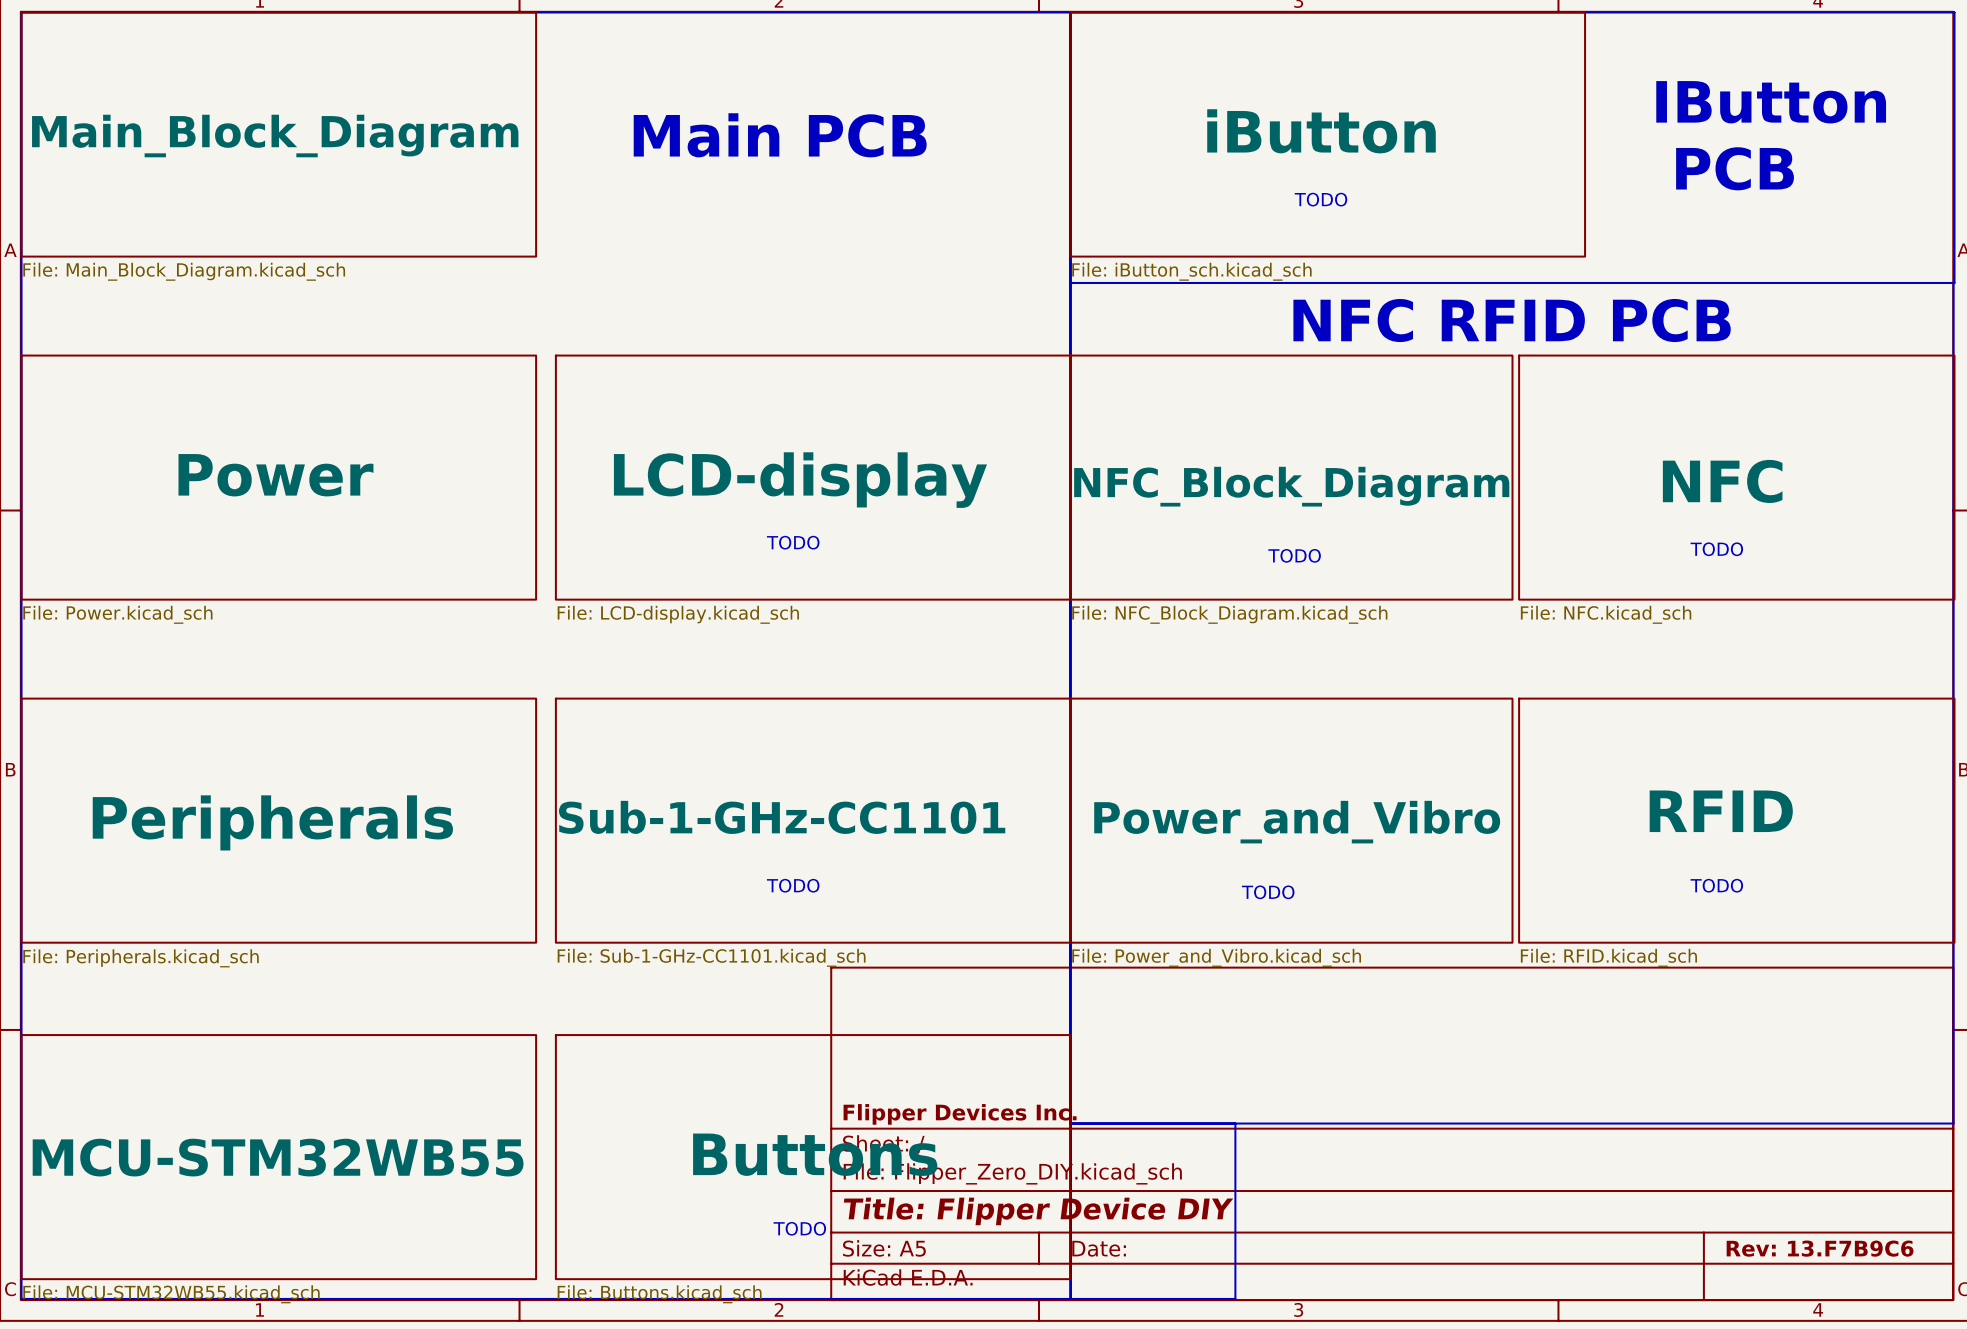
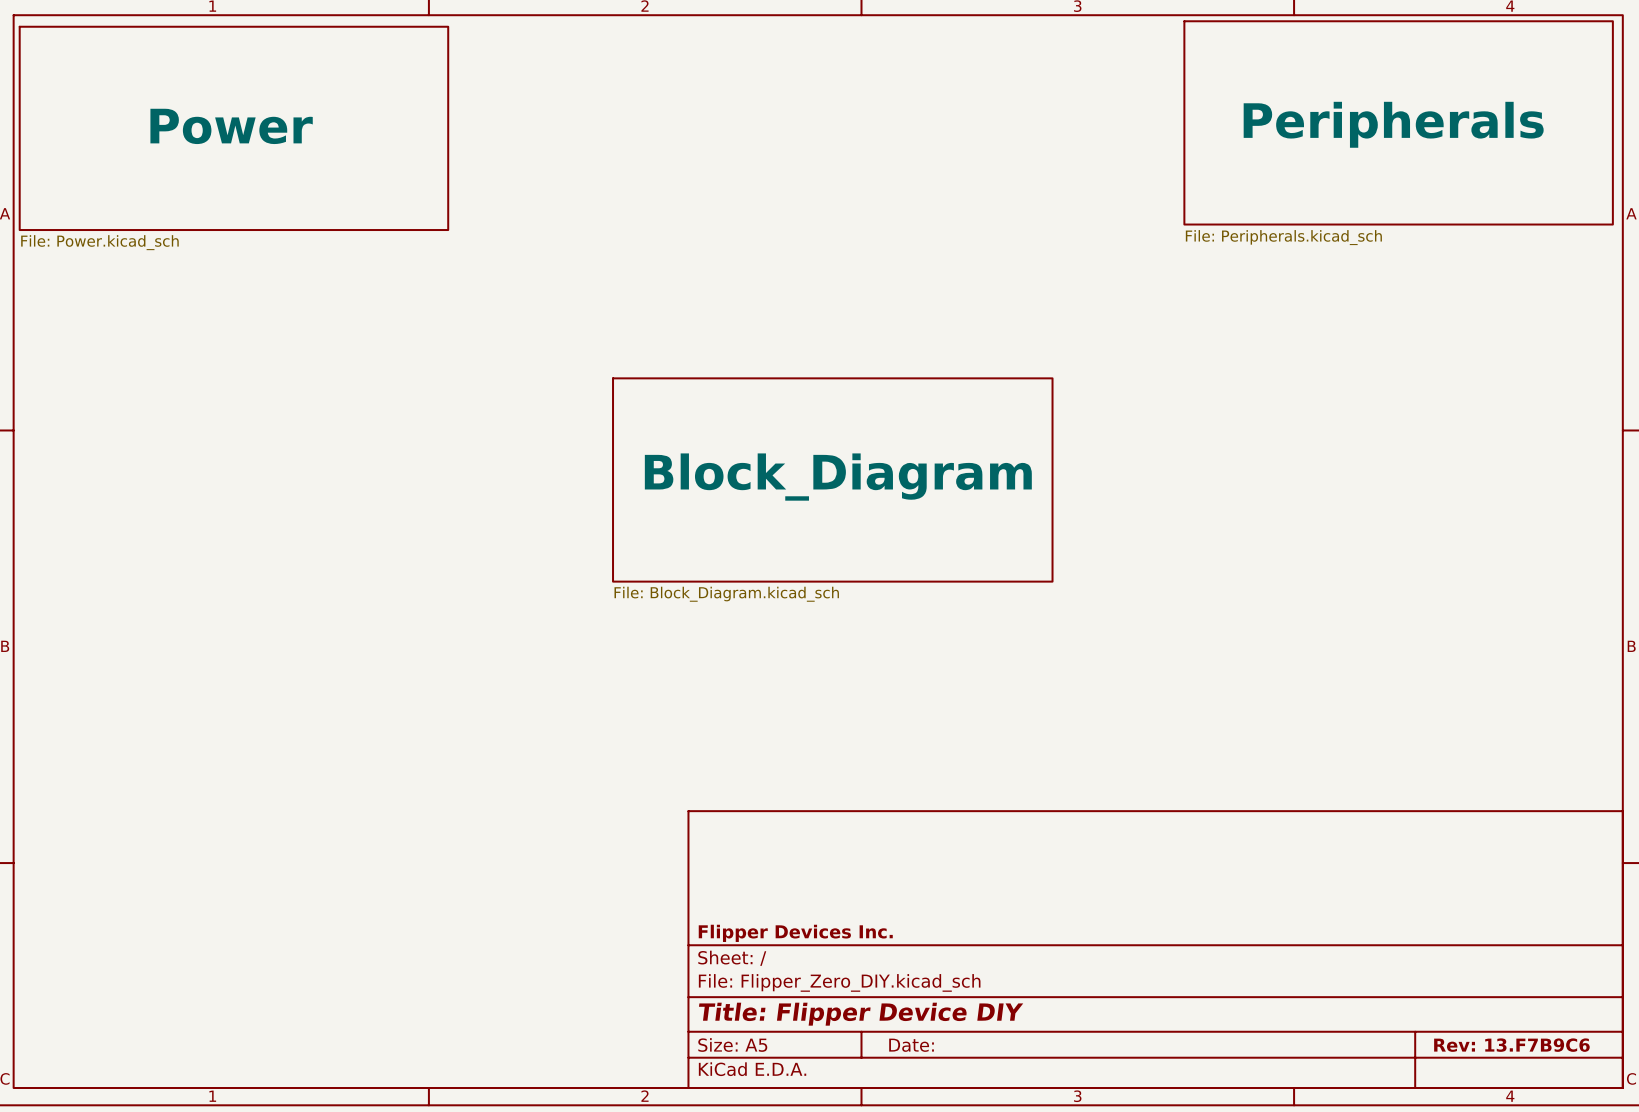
line: (1070, 12) (1070, 1298) (21, 1298) (21, 12) (1954, 12) (1954, 282) (1070, 282) -> none
text: IButton (1771, 102) -> none
sheet Main_Block_Diagram: File: Main_Block_Diagram.kicad_sch (278, 134) -> none
sheet iButton: File: iButton_sch.kicad_sch (1327, 134) -> none
text: Main PCB (780, 135) -> none
sheet Peripherals: none -> File: Peripherals.kicad_sch (1398, 122)
sheet Power: none -> File: Power.kicad_sch (233, 128)
text: PCB (1735, 168) -> none
text: TODO (1320, 199) -> none
line: (1953, 282) (1953, 1123) (1070, 1123) -> none
text: NFC RFID PCB (1512, 320) -> none
sheet Power: File: Power.kicad_sch (278, 477) -> none
sheet LCD-display: File: LCD-display.kicad_sch (813, 477) -> none
sheet NFC_Block_Diagram: File: NFC_Block_Diagram.kicad_sch (1291, 477) -> none
sheet NFC: File: NFC.kicad_sch (1736, 477) -> none
text: TODO (793, 542) -> none
text: TODO (1716, 549) -> none
text: TODO (1294, 555) -> none
sheet Block_Diagram: none -> File: Block_Diagram.kicad_sch (832, 479)
sheet Peripherals: File: Peripherals.kicad_sch (278, 820) -> none
sheet Sub-1-GHz-CC1101: File: Sub-1-GHz-CC1101.kicad_sch (813, 820) -> none
sheet Power_and_Vibro: File: Power_and_Vibro.kicad_sch (1291, 820) -> none
sheet RFID: File: RFID.kicad_sch (1736, 820) -> none
text: TODO (793, 885) -> none
text: TODO (1716, 885) -> none
text: TODO (1268, 892) -> none
line: (1070, 1123) (1235, 1123) (1235, 1298) (1070, 1298) (1070, 1123) -> none
sheet MCU-STM32WB55: File: MCU-STM32WB55.kicad_sch (278, 1157) -> none
sheet Buttons: File: Buttons.kicad_sch (813, 1157) -> none
text: TODO (799, 1228) -> none

